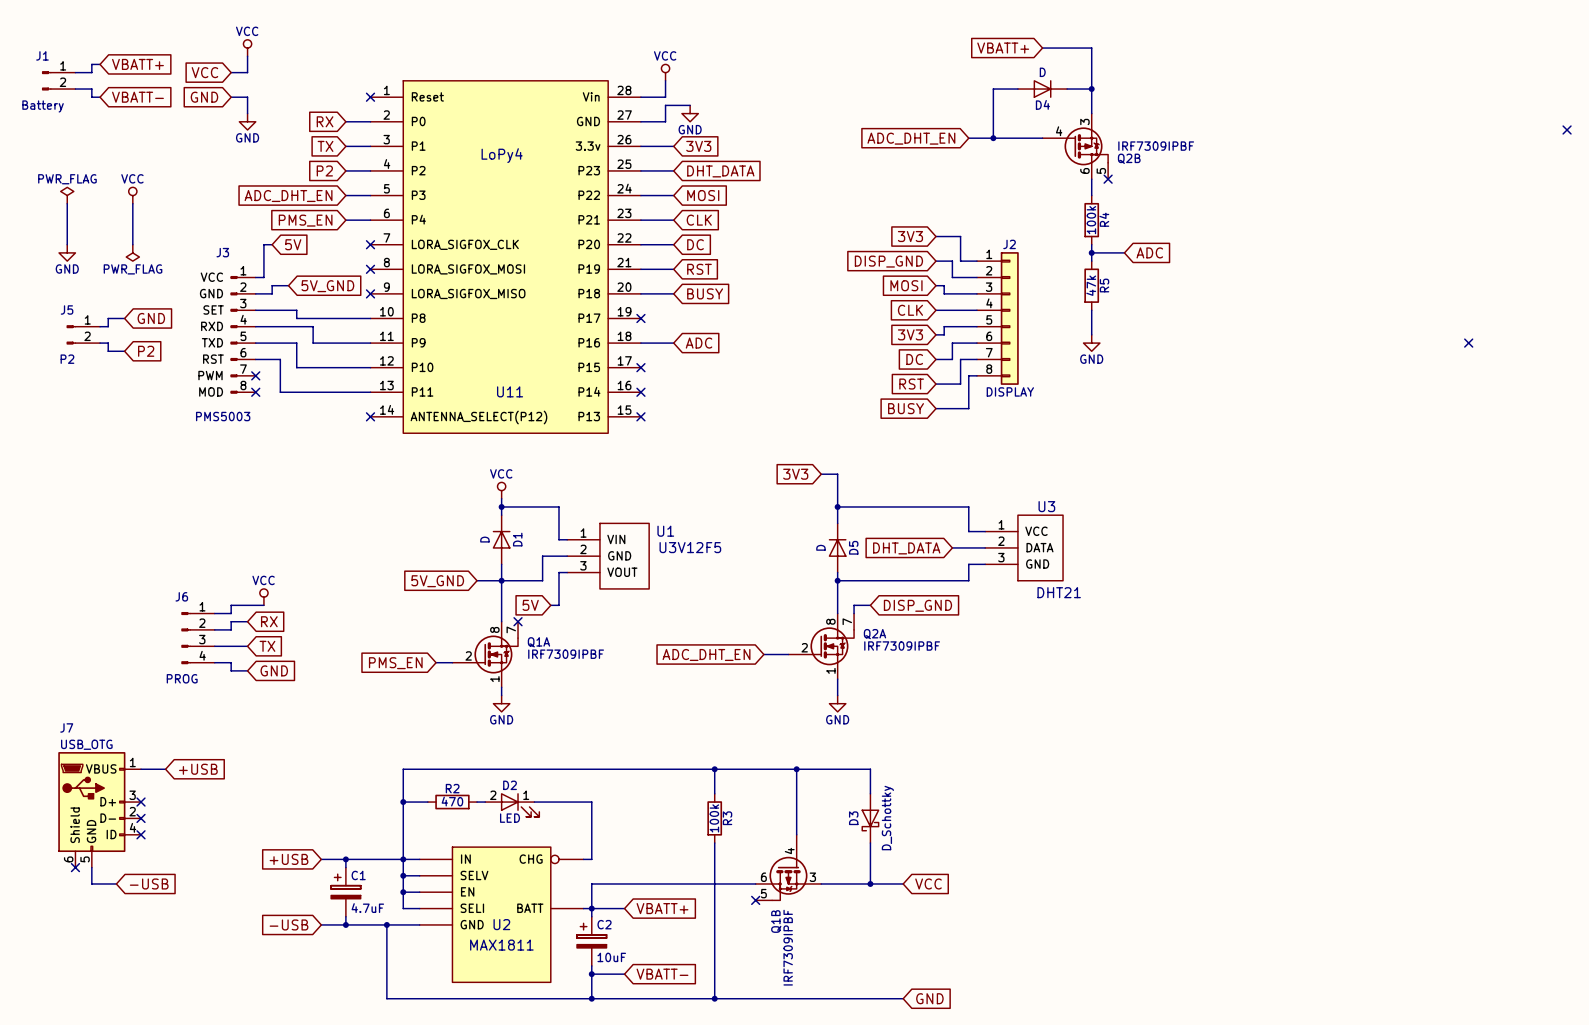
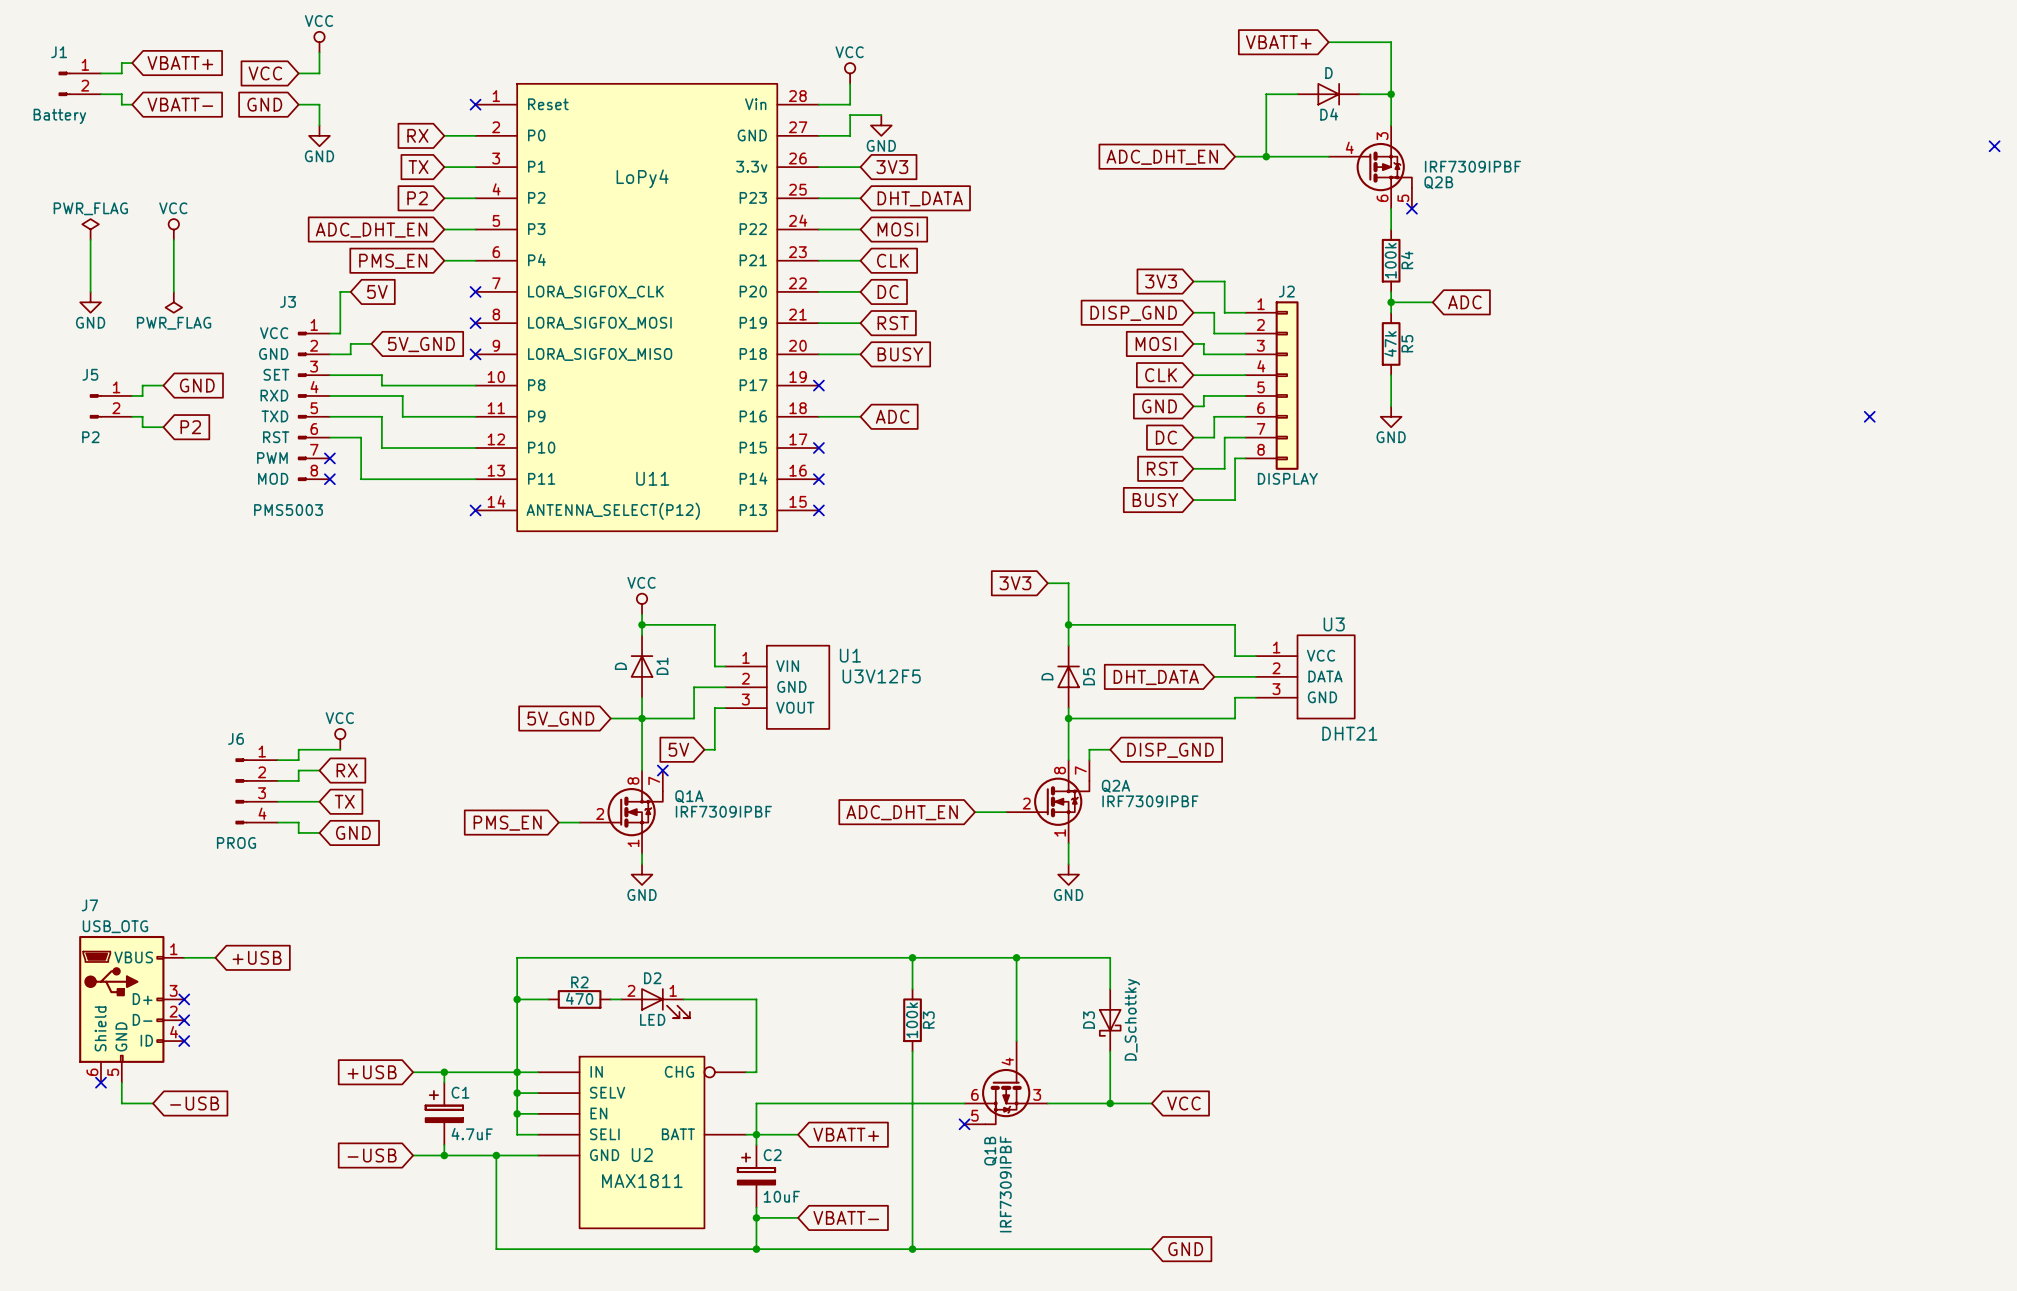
global label: 3V3 (910, 334) -> GND (1159, 406)

